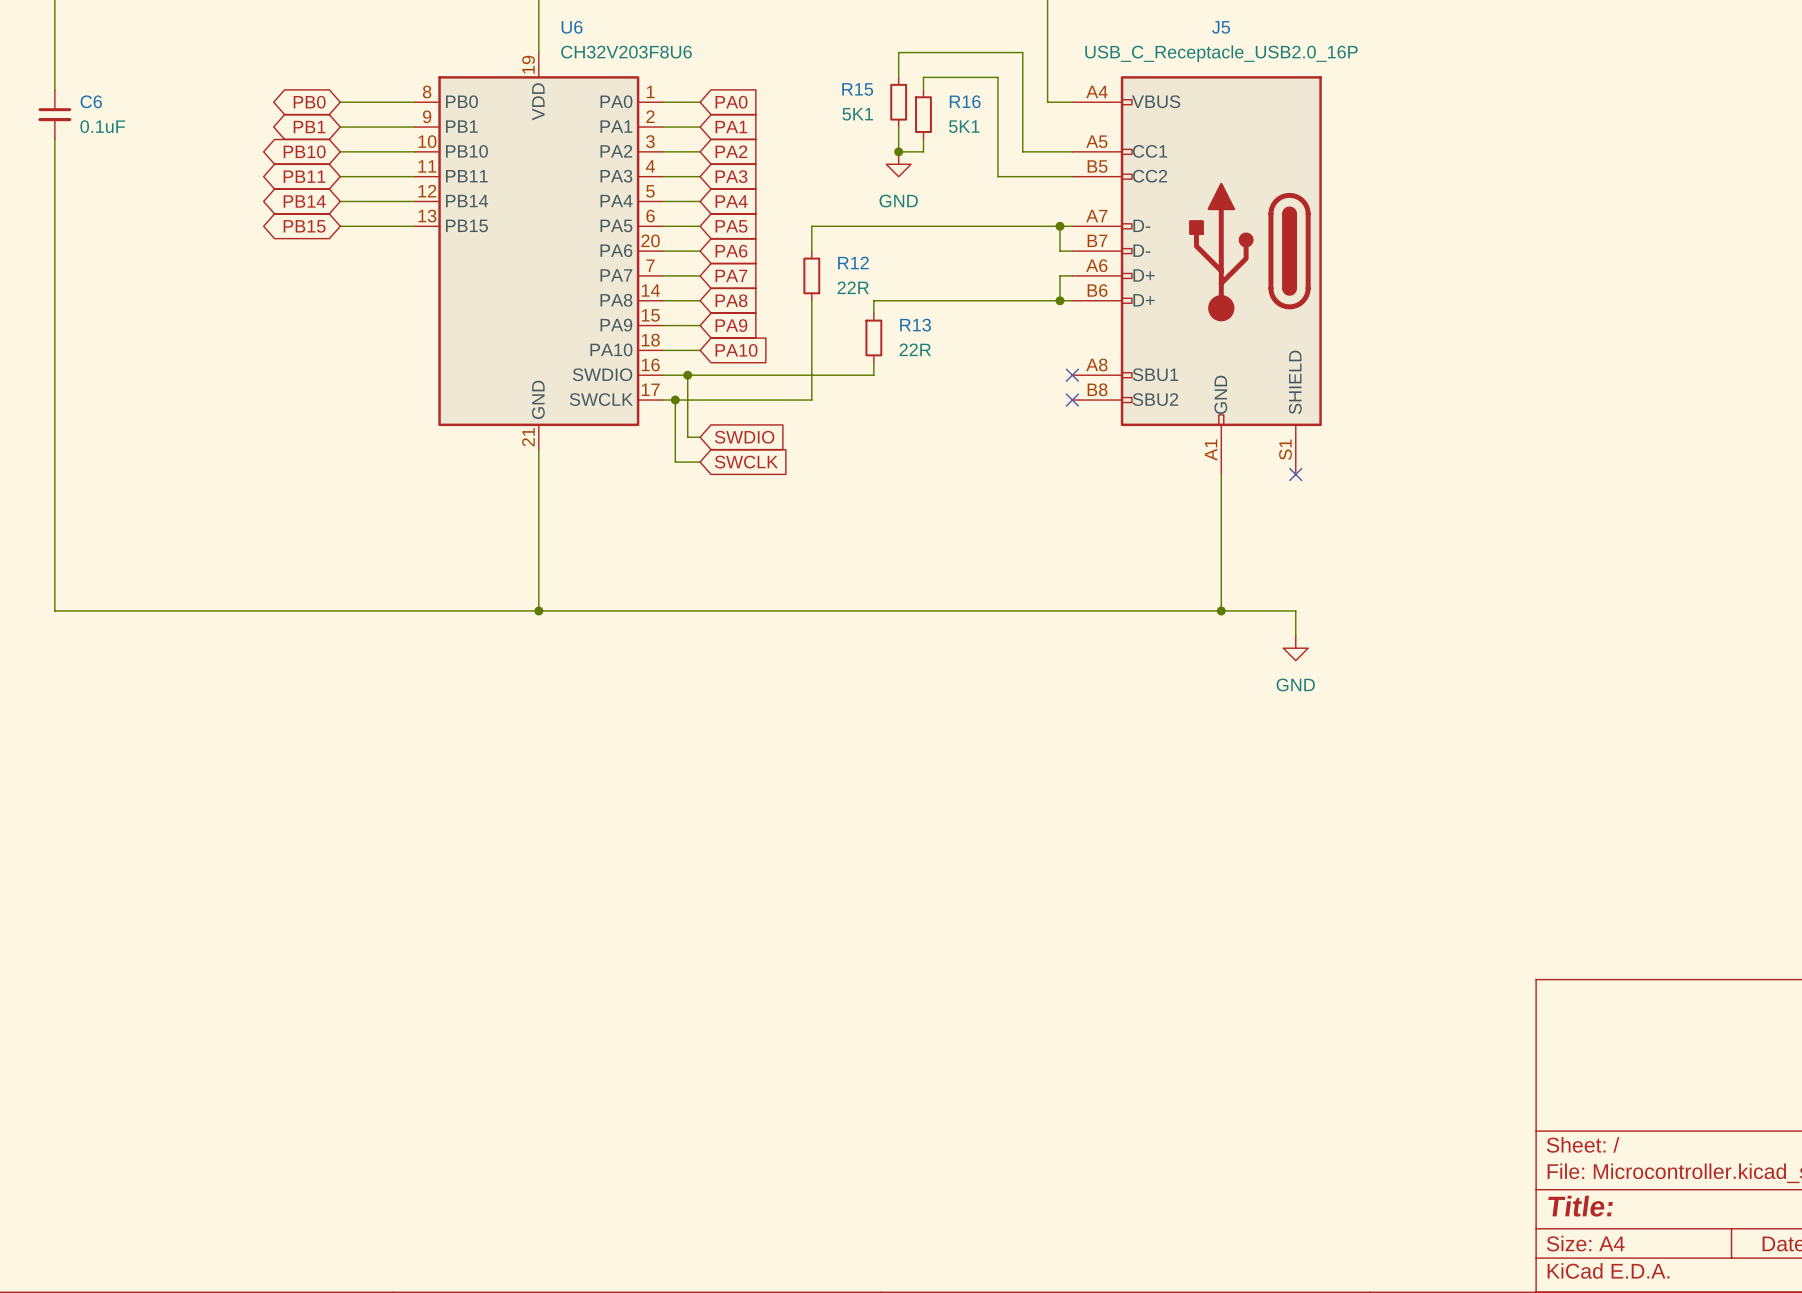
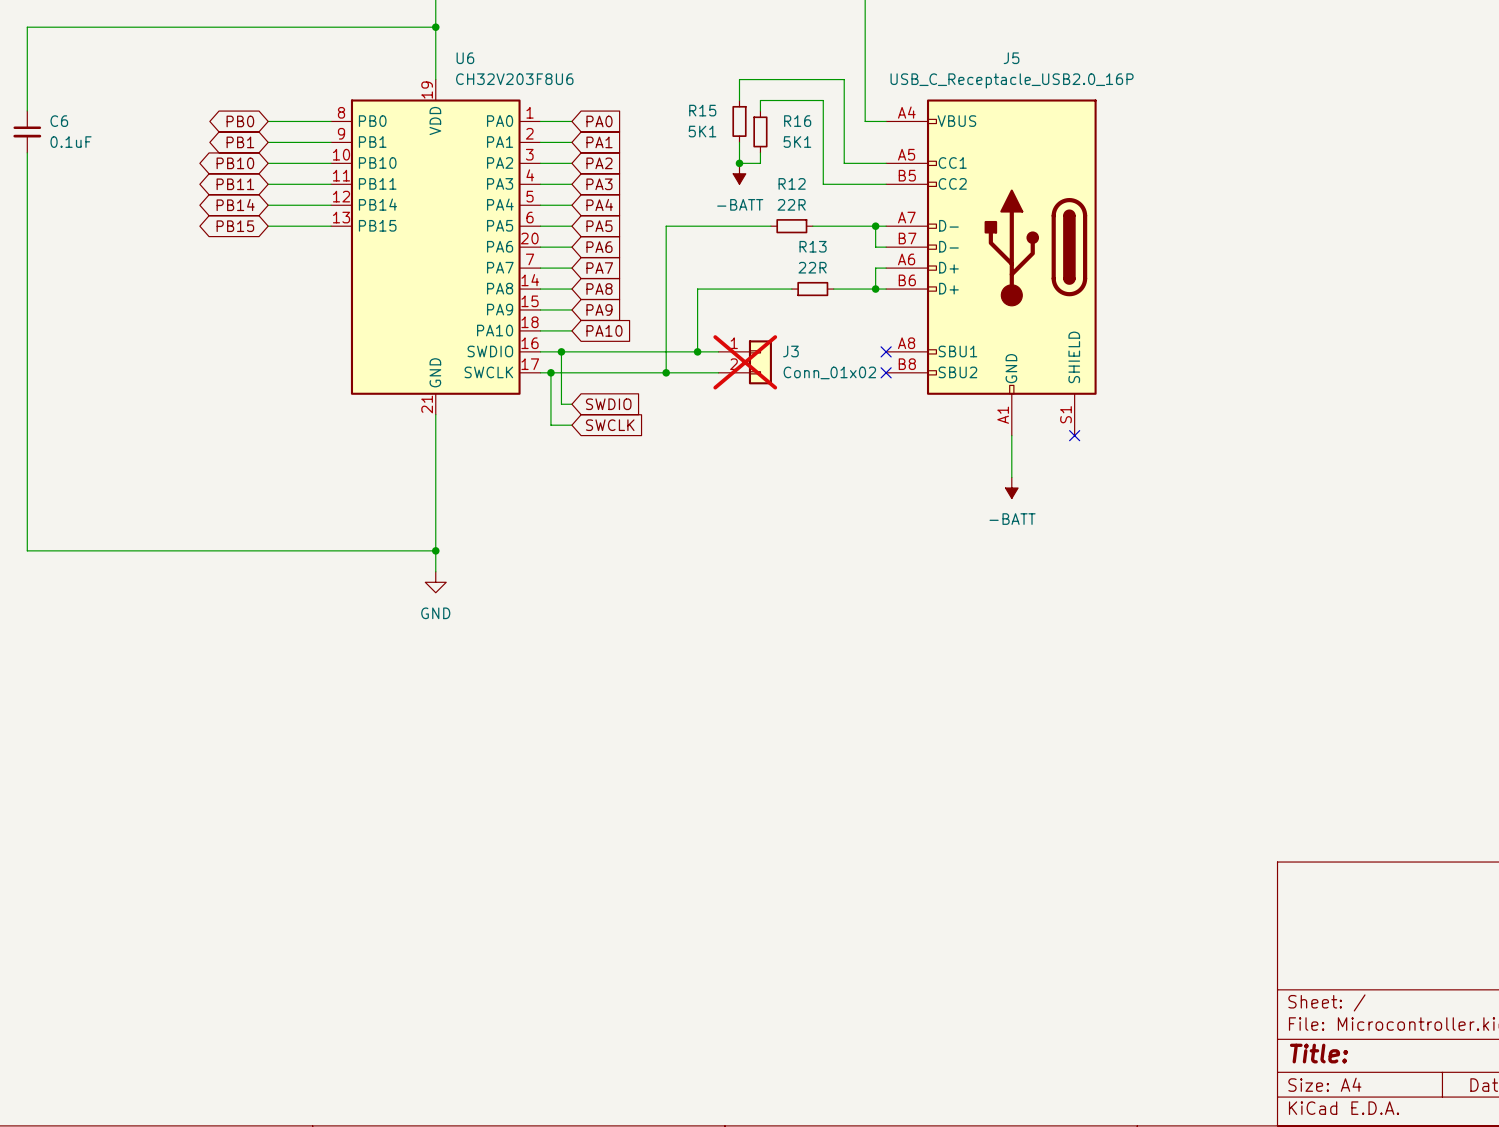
power symbol: GND (898, 164) -> -BATT (739, 173)
wire: (935, 226) (985, 226) -> none
wire: none -> (666, 247) (666, 289)
R12 name position: R12 (853, 262) -> R12 (792, 183)
R12 rotation: 0° (811, 275) -> 90° clockwise (791, 226)
R12 position: (811, 275) -> (791, 226)
R12 value position: 22R (853, 287) -> 22R (791, 204)
wire: (873, 300) (873, 313) -> (718, 289) (697, 289) (697, 351)
wire: (960, 300) (1010, 300) -> none
R13 name position: R13 (915, 325) -> R13 (813, 246)
R13 rotation: 0° (873, 337) -> 90° clockwise (812, 289)
R13 position: (873, 337) -> (812, 289)
R13 value position: 22R (915, 349) -> 22R (812, 267)
wire: (873, 362) (873, 375) -> none
junction: none -> (697, 351)
J3: none -> Conn_01x02 (745, 362)
wire: none -> (666, 372) (718, 372)
junction: none -> (666, 372)
wire: (1221, 524) (1221, 610) -> none
power symbol: none -> -BATT (1011, 488)
wire: (538, 610) (1295, 610) (1295, 635) -> (435, 550) (435, 571)
junction: (1221, 610) -> none
power symbol: none -> GND (435, 582)
power symbol: GND (1295, 648) -> none

